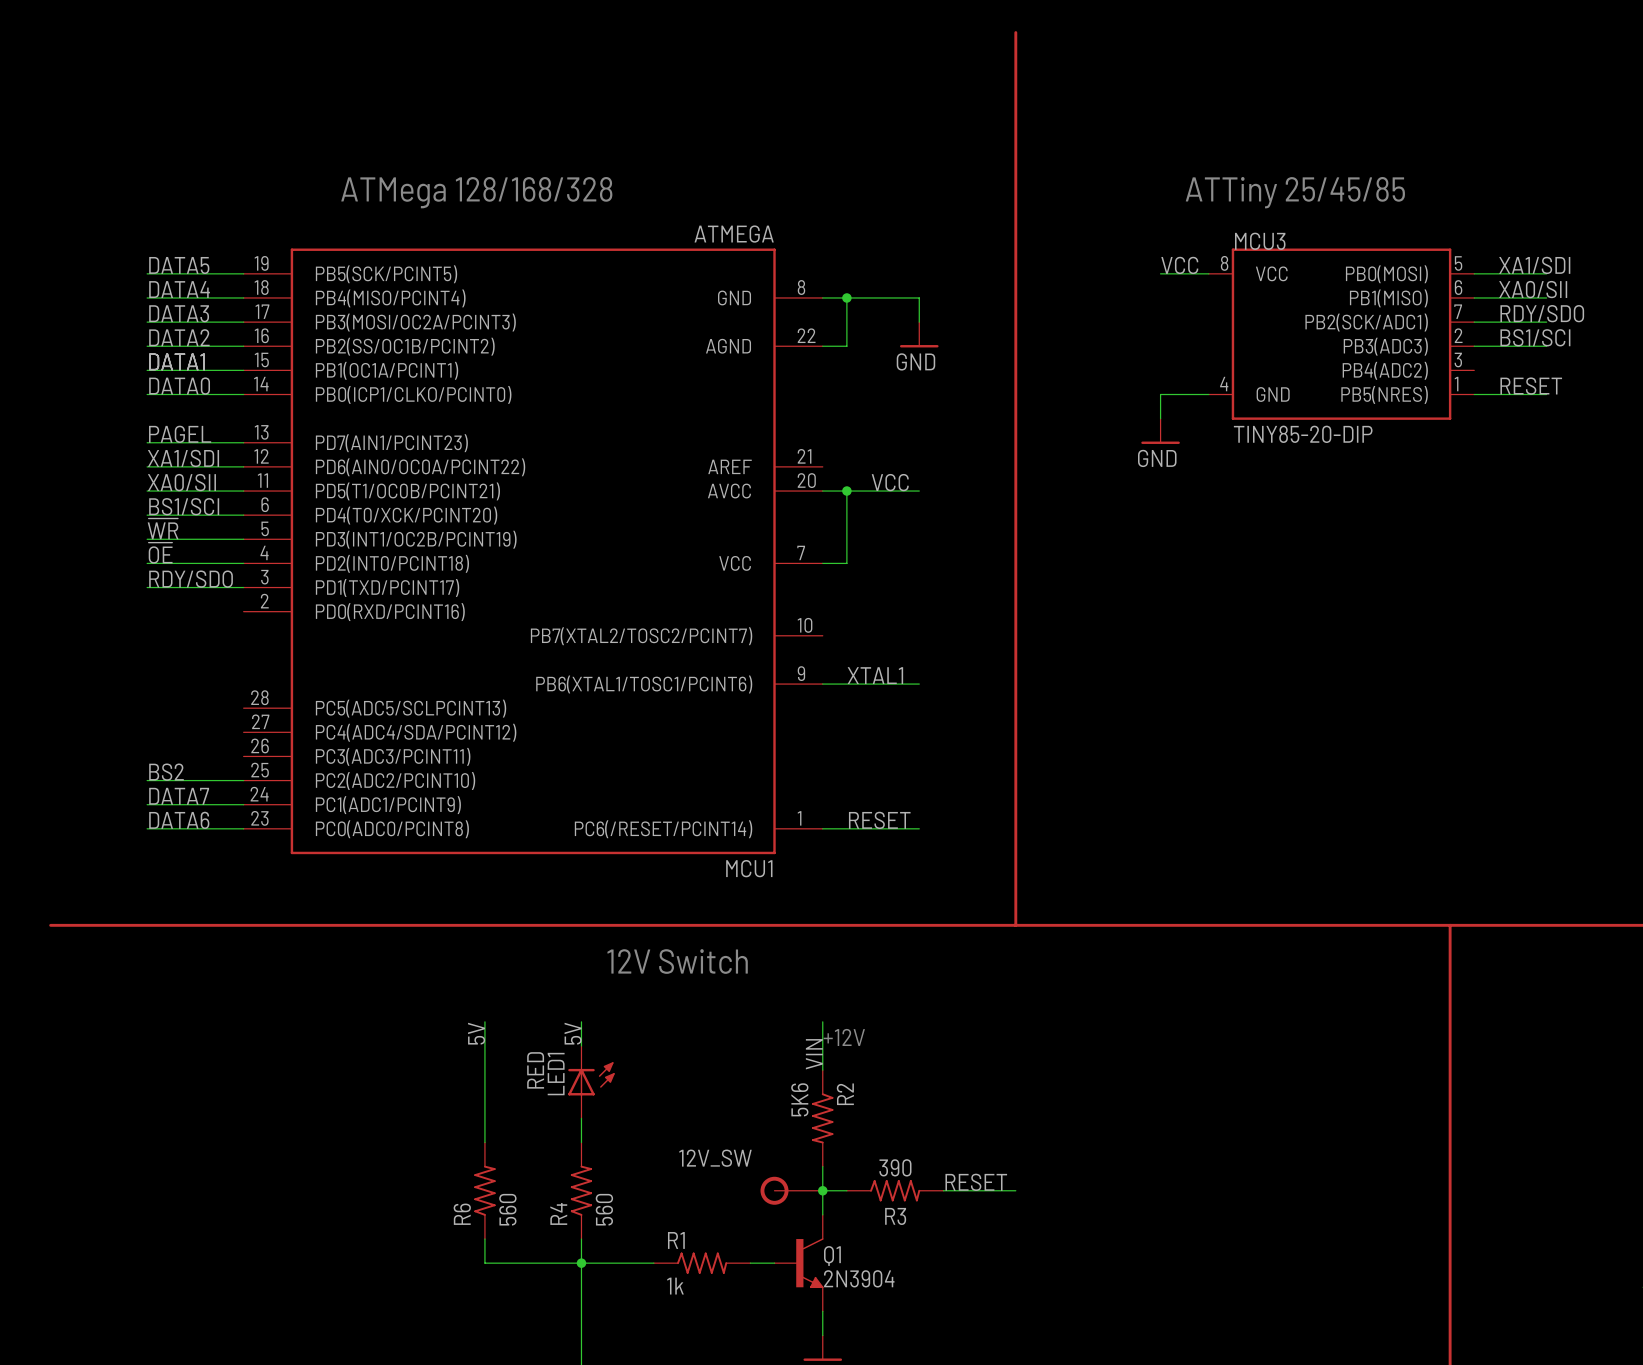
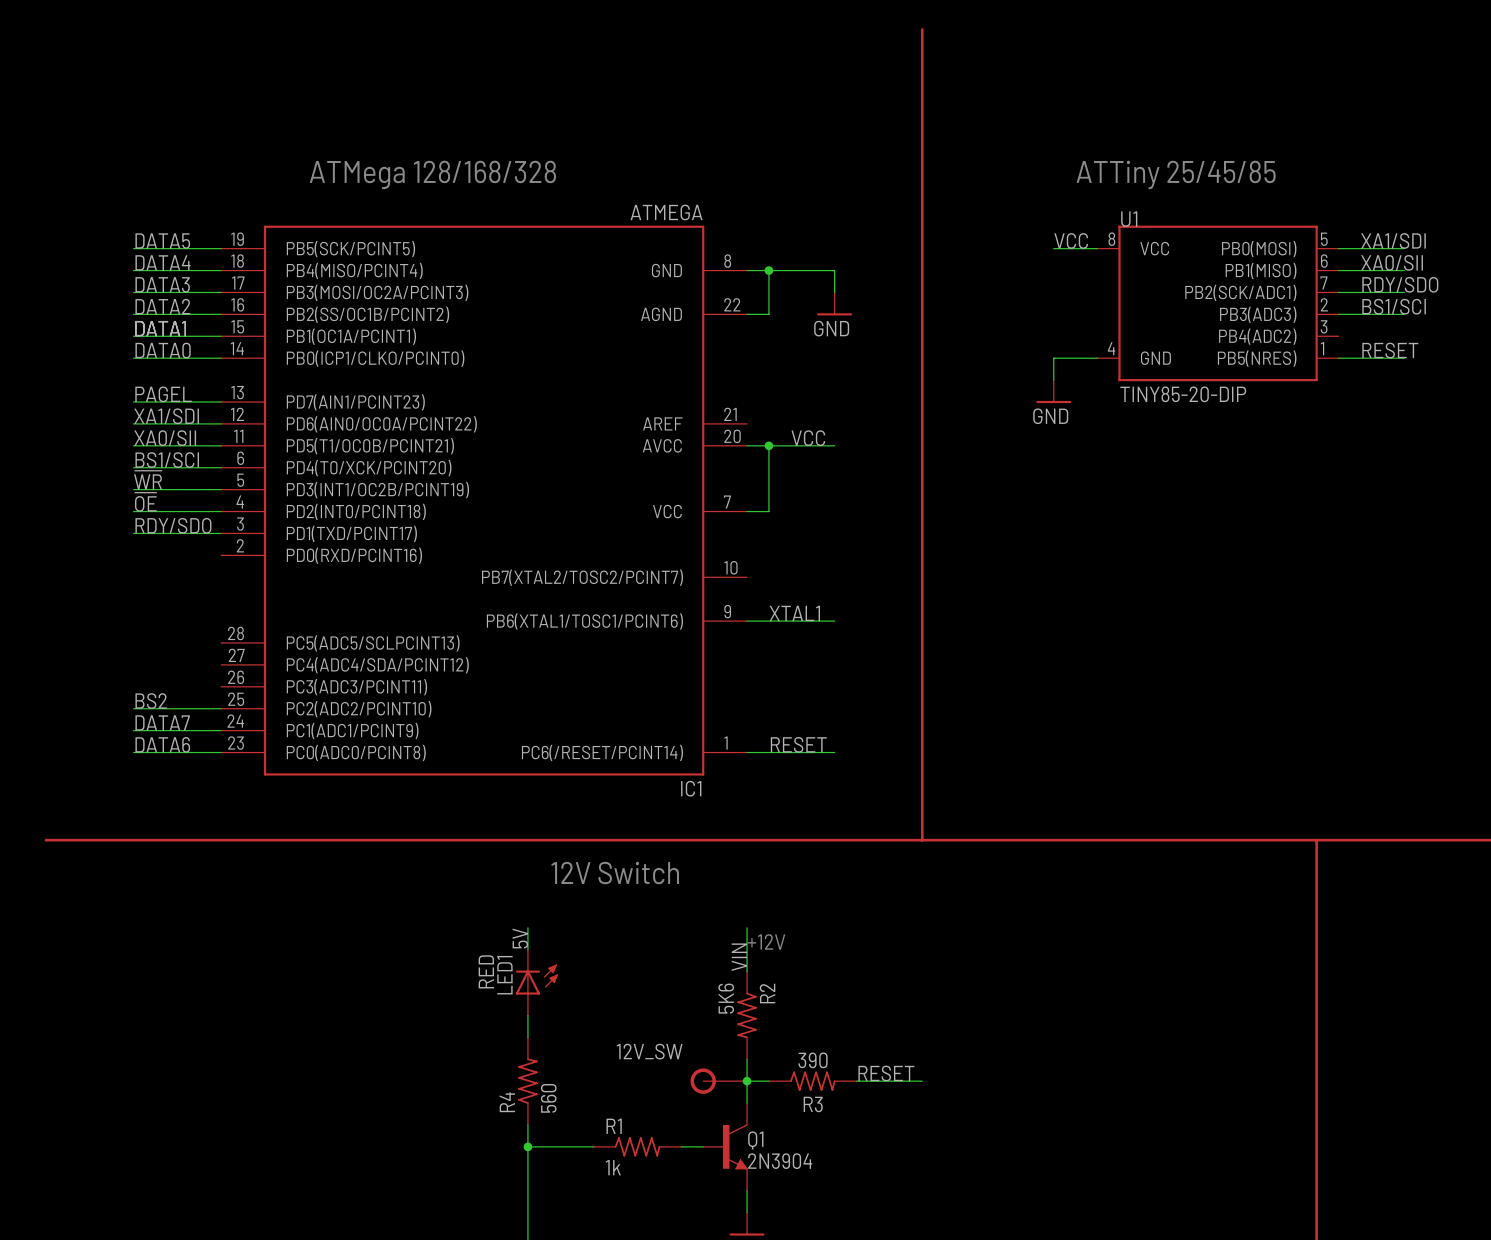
MCU3 name: MCU3 (1260, 241) -> U1 (1129, 219)
MCU1 name: MCU1 (749, 868) -> IC1 (691, 788)
wire: (484, 1021) (484, 1142) -> none
label: 5V (476, 1033) -> none
R6: 560 (484, 1190) -> none
wire: (484, 1239) (484, 1263) (581, 1263) -> none

